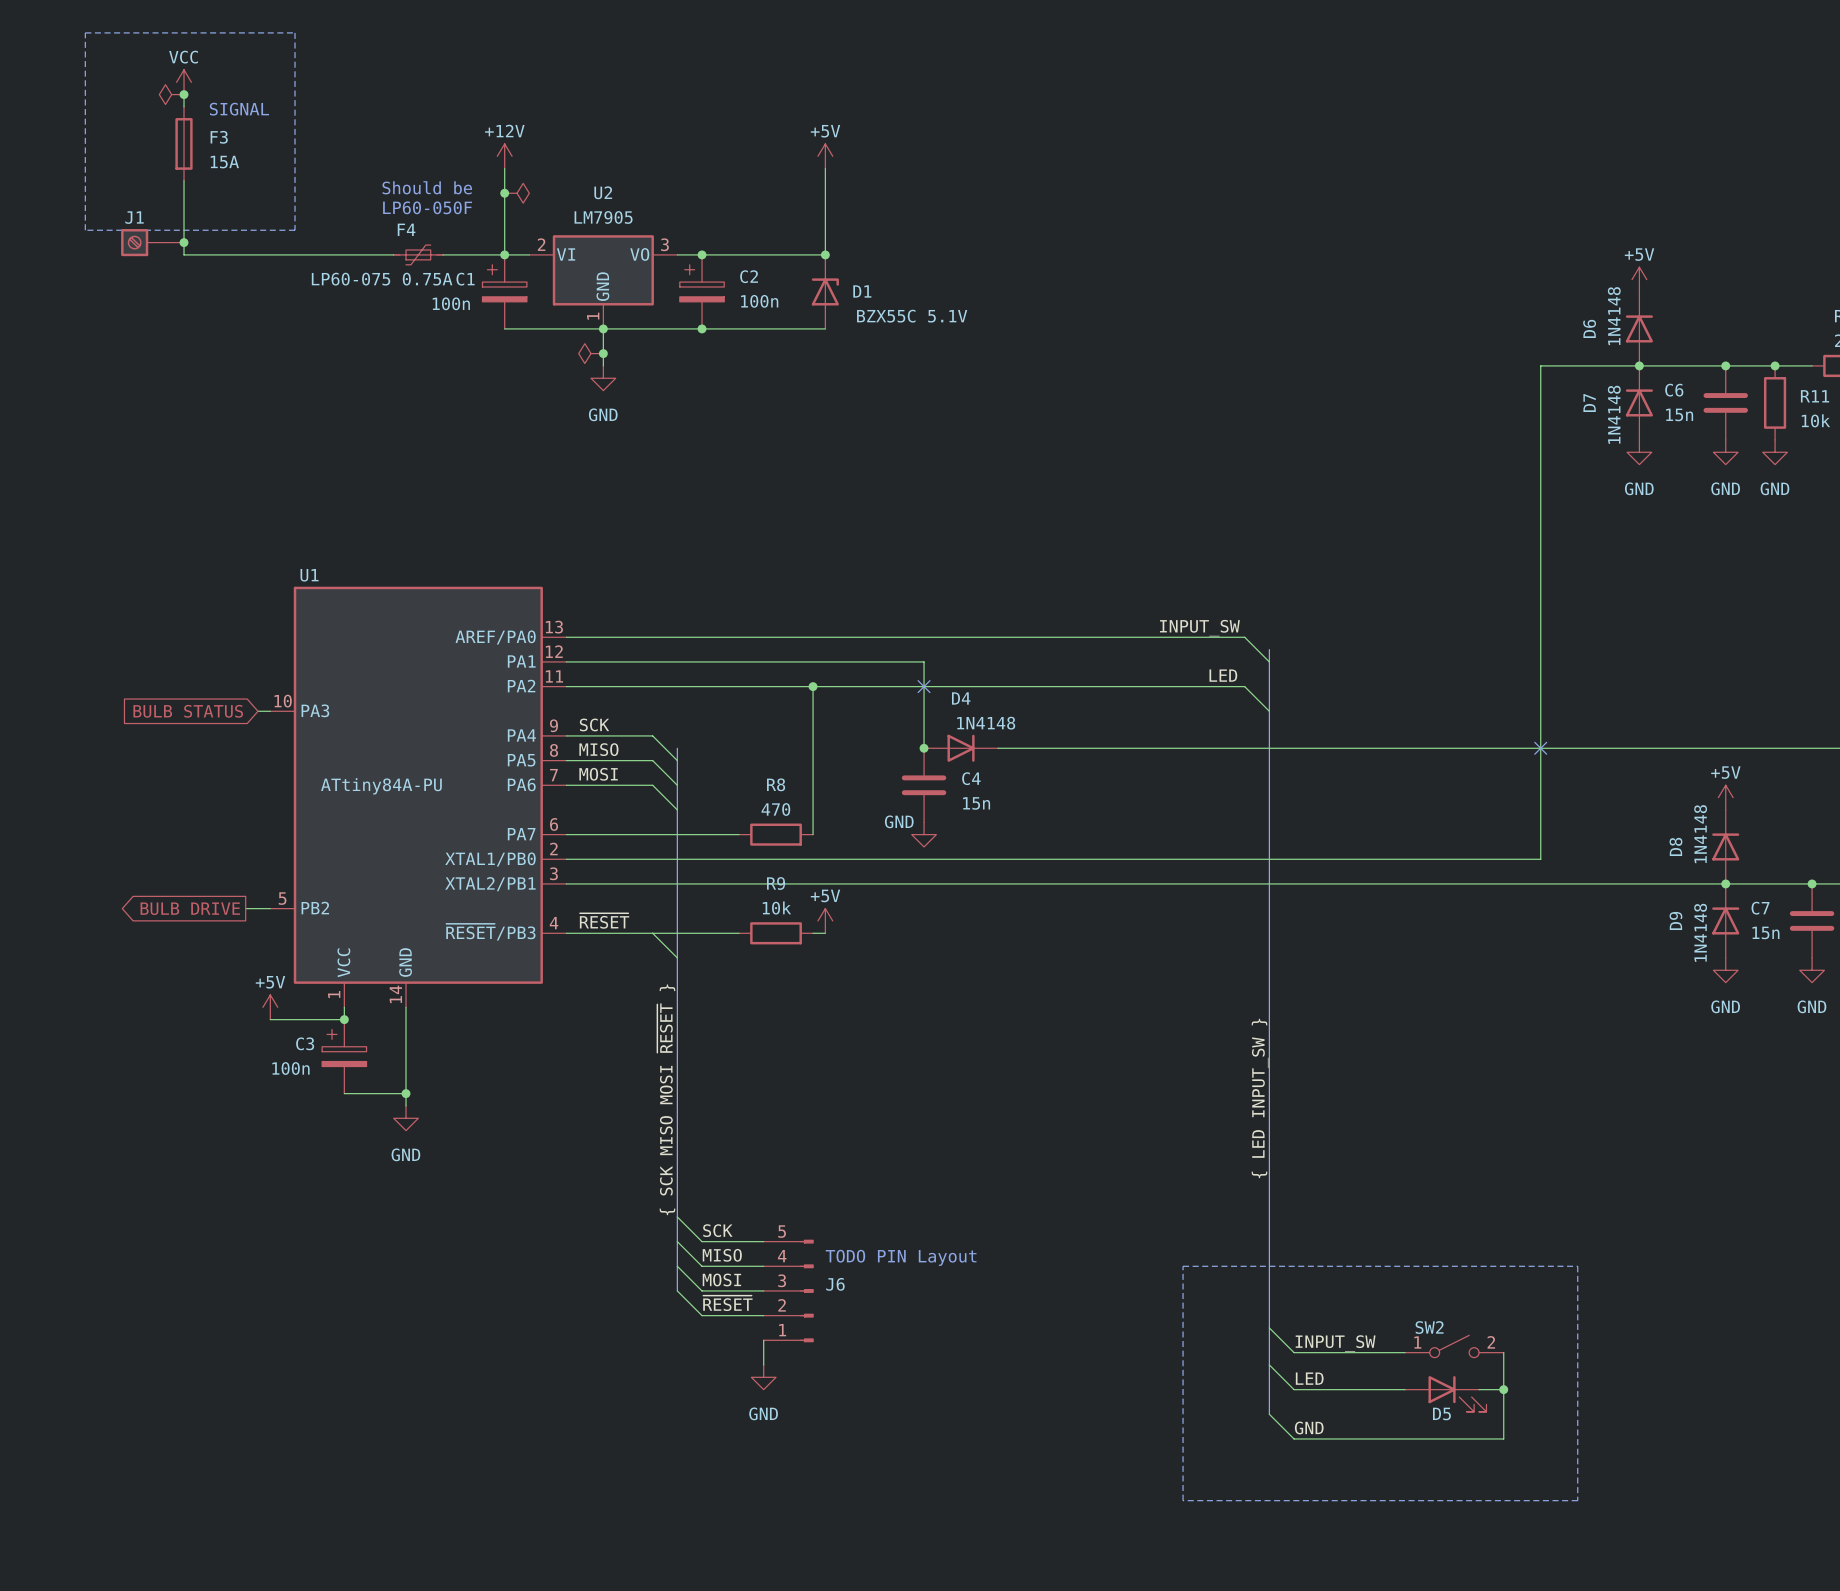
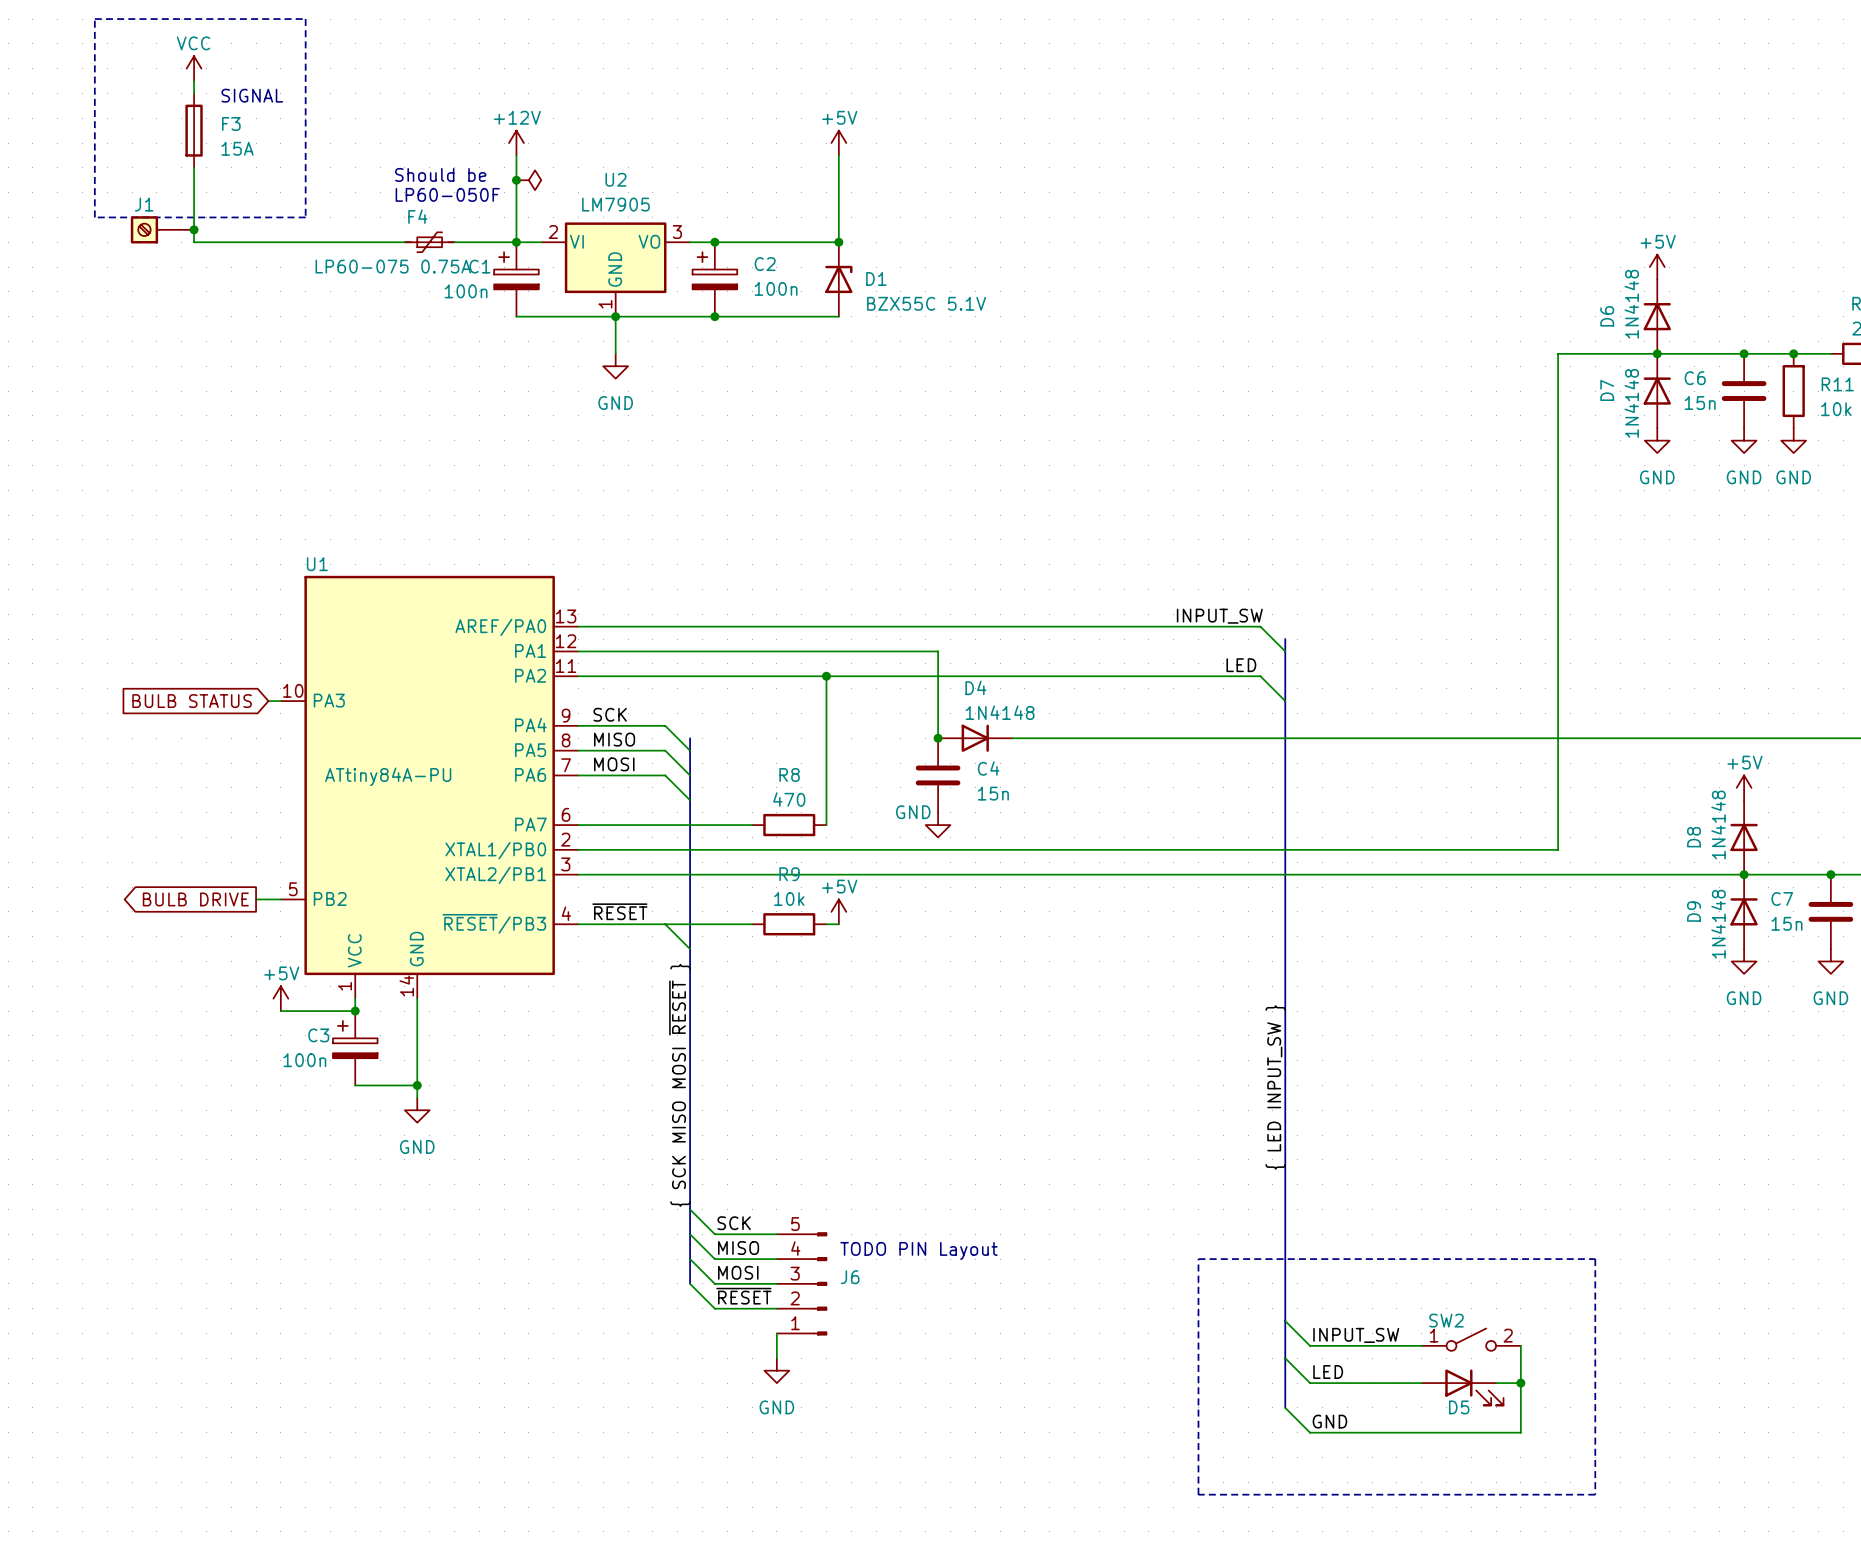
power symbol: (171, 94) -> none
junction: (184, 94) -> none
power symbol: (591, 353) -> none
junction: (603, 353) -> none
no-connect mark: (924, 686) -> none
no-connect mark: (1540, 748) -> none

